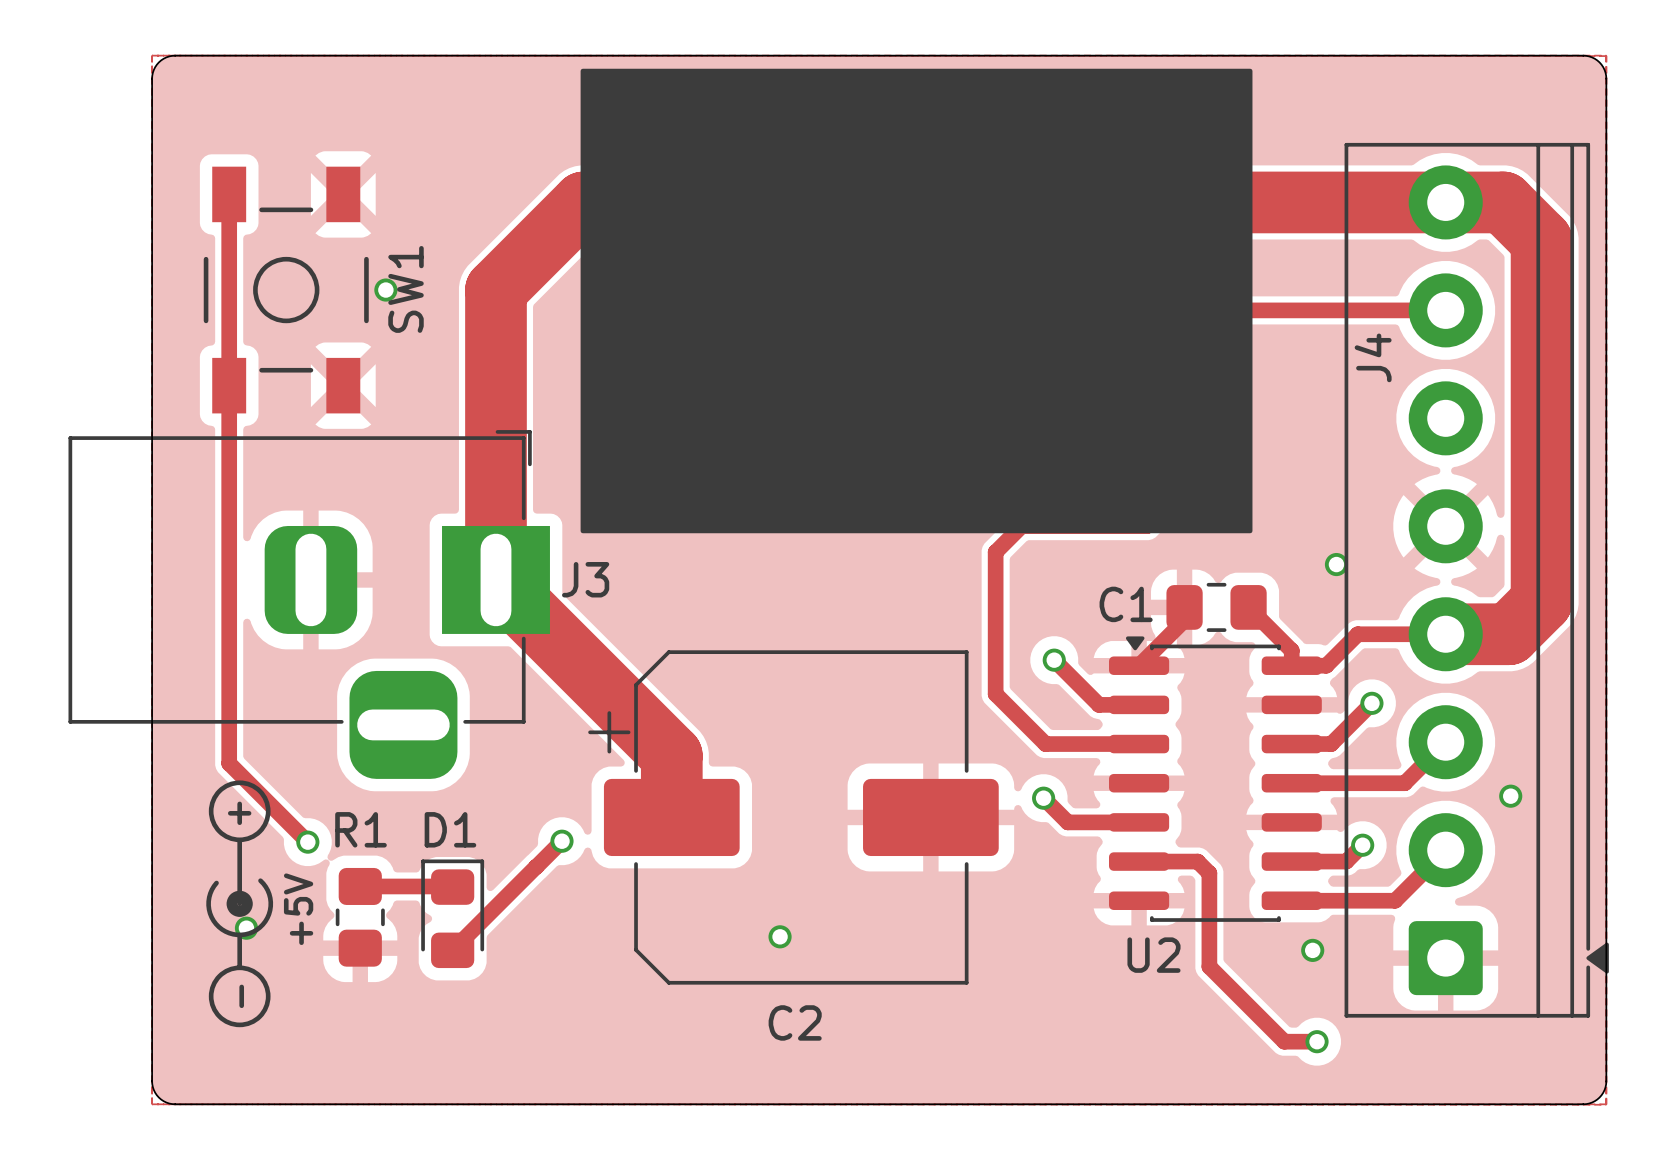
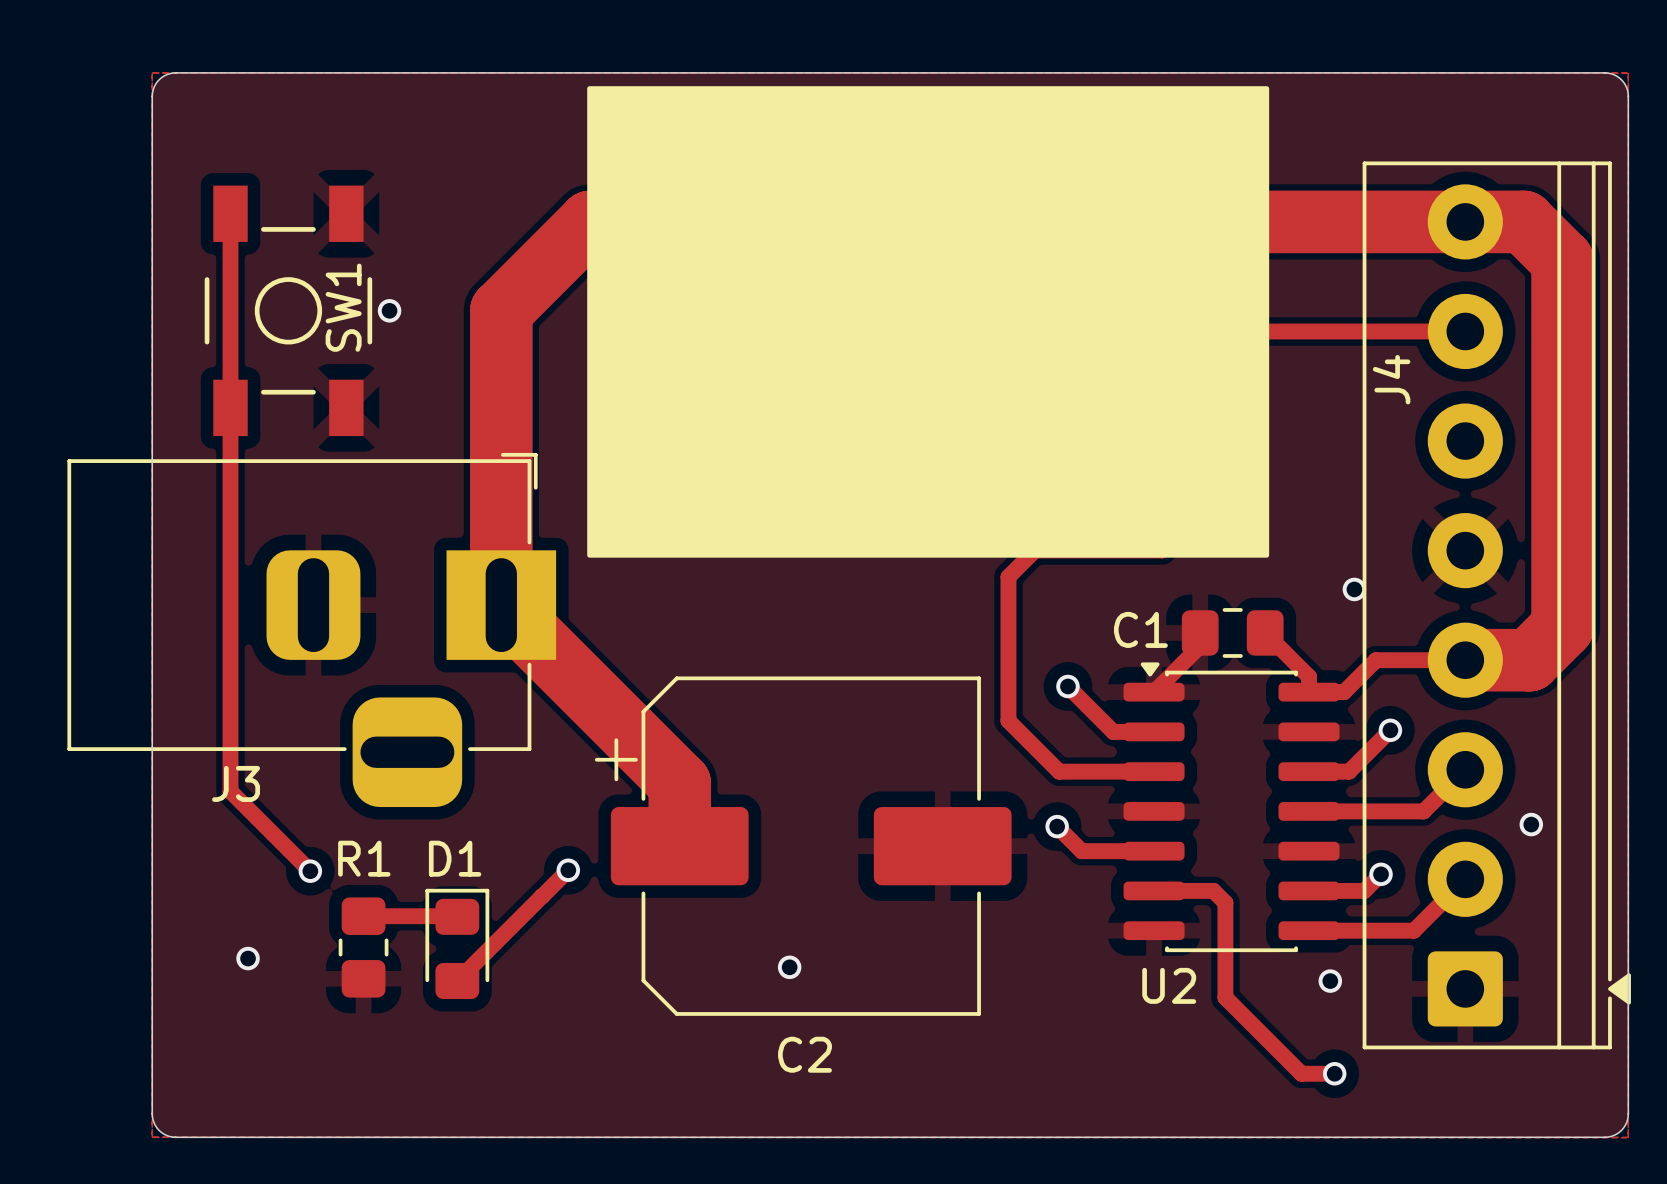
SW1 name position: SW1 (406, 289) -> SW1 (343, 307)
J3 name position: J3 (585, 579) -> J3 (236, 783)
drawing: [206, 780, 274, 1028] -> none
text: + (239, 813) -> none
text: +5V (298, 909) -> none
text: - (241, 996) -> none

